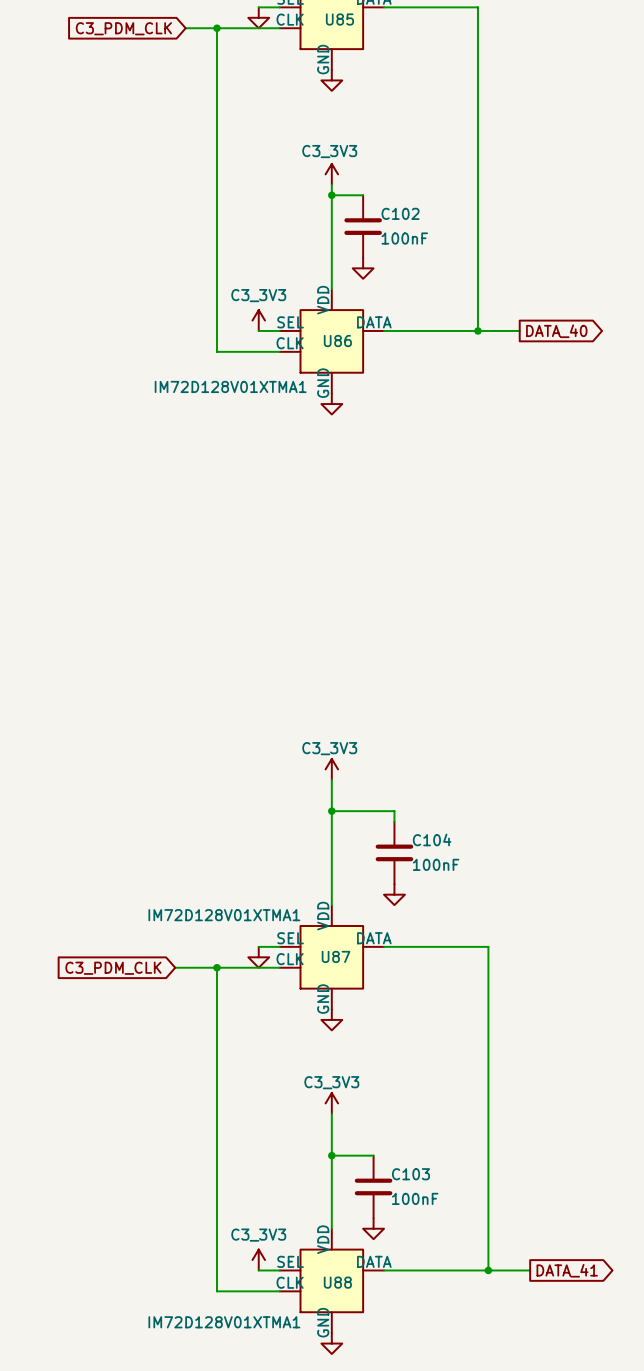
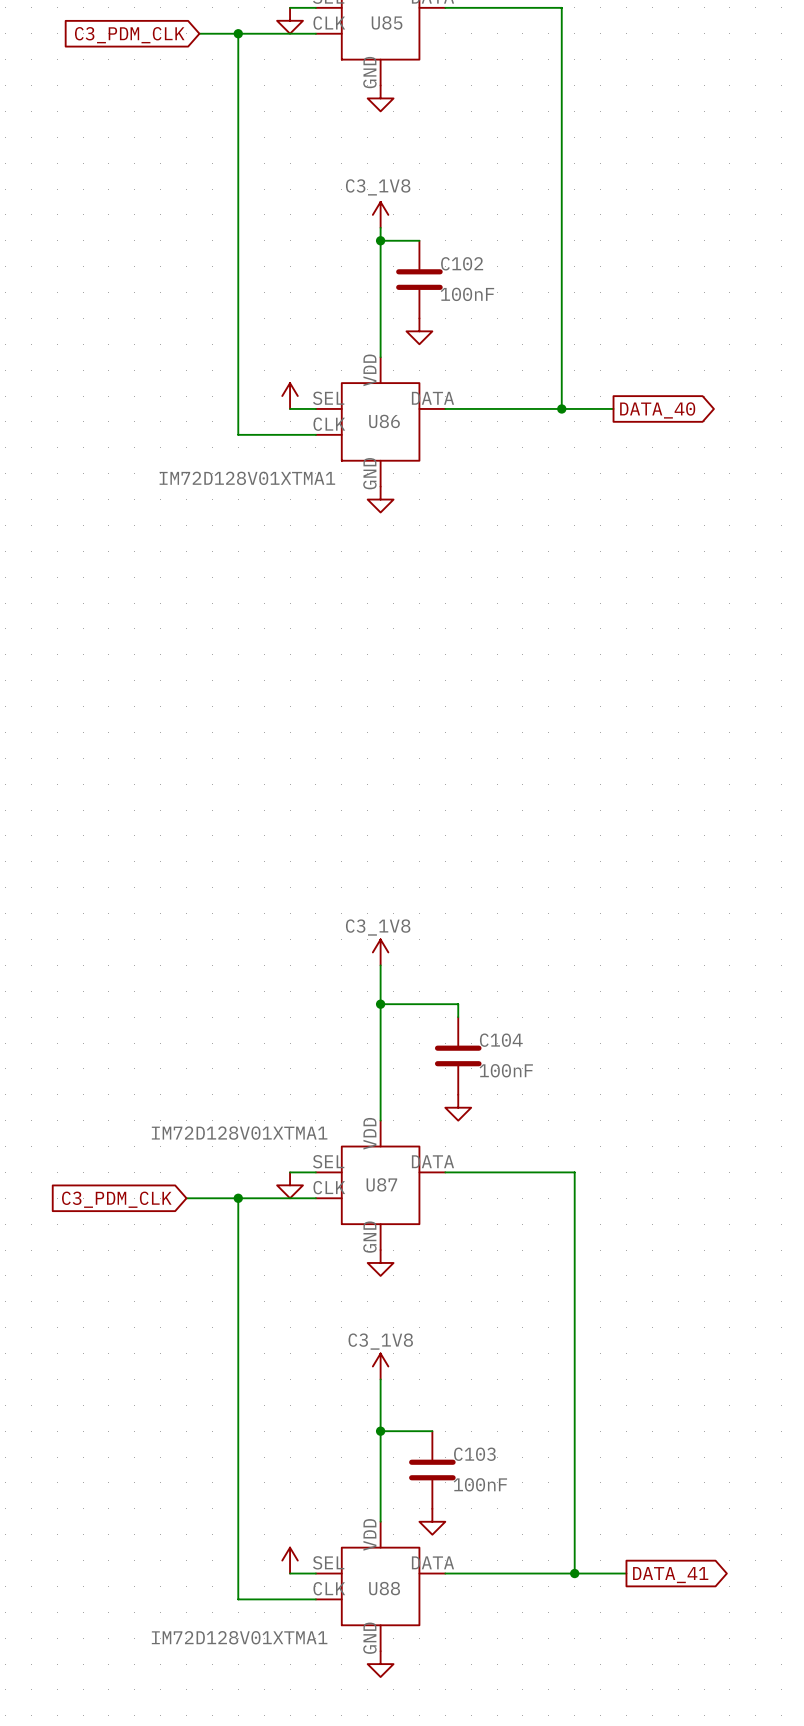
power symbol: C3_3V3 (331, 174) -> C3_1V8 (380, 214)
power symbol text: C3_3V3 (258, 295) -> none
power symbol: C3_3V3 (331, 769) -> C3_1V8 (380, 952)
power symbol: C3_3V3 (331, 1103) -> C3_1V8 (380, 1366)
power symbol text: C3_3V3 (258, 1235) -> none

